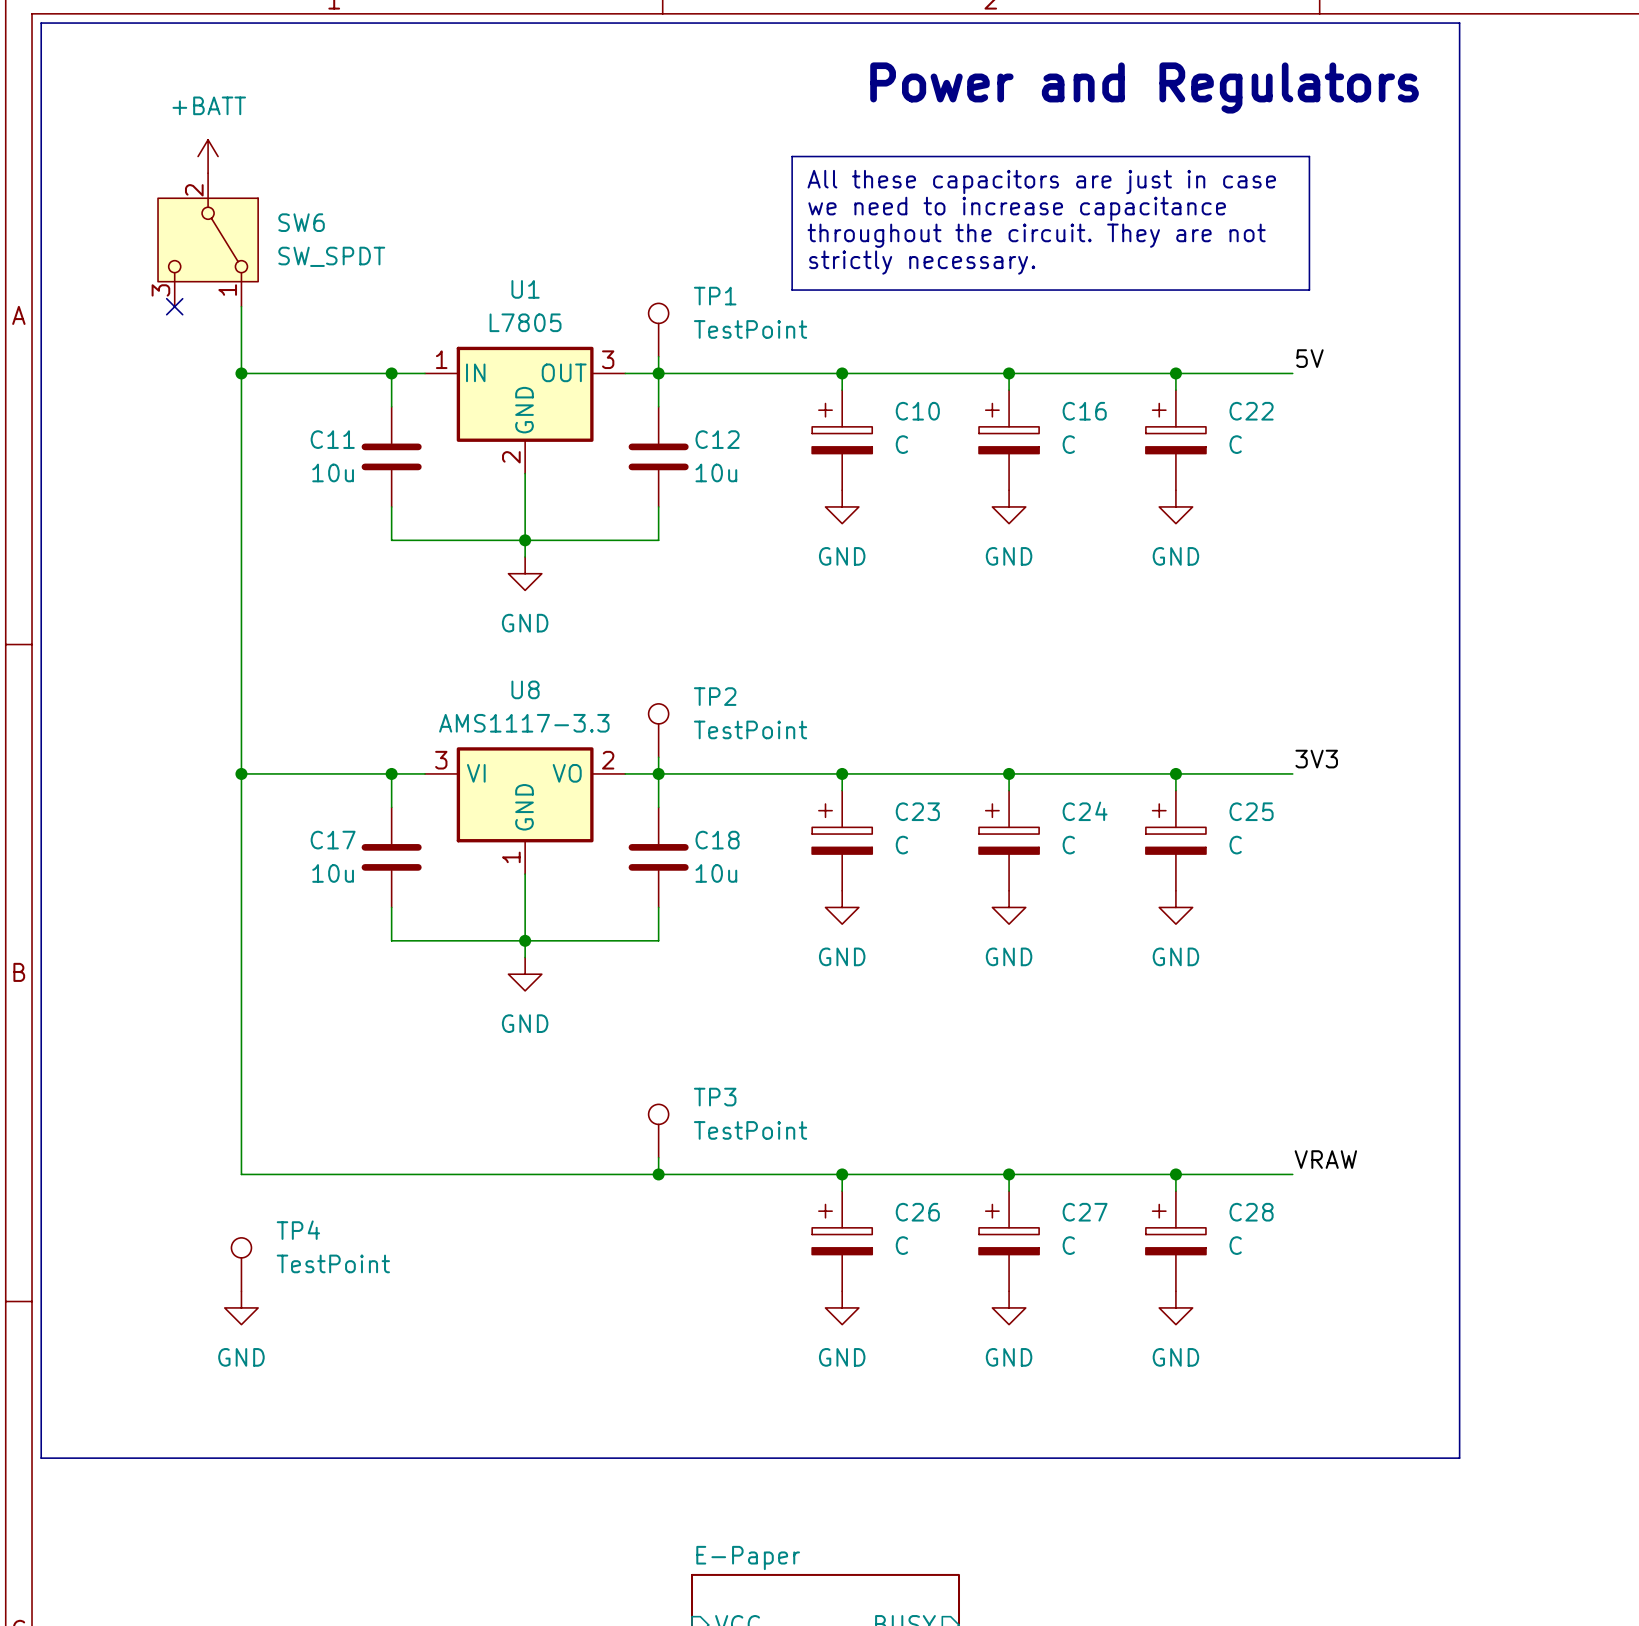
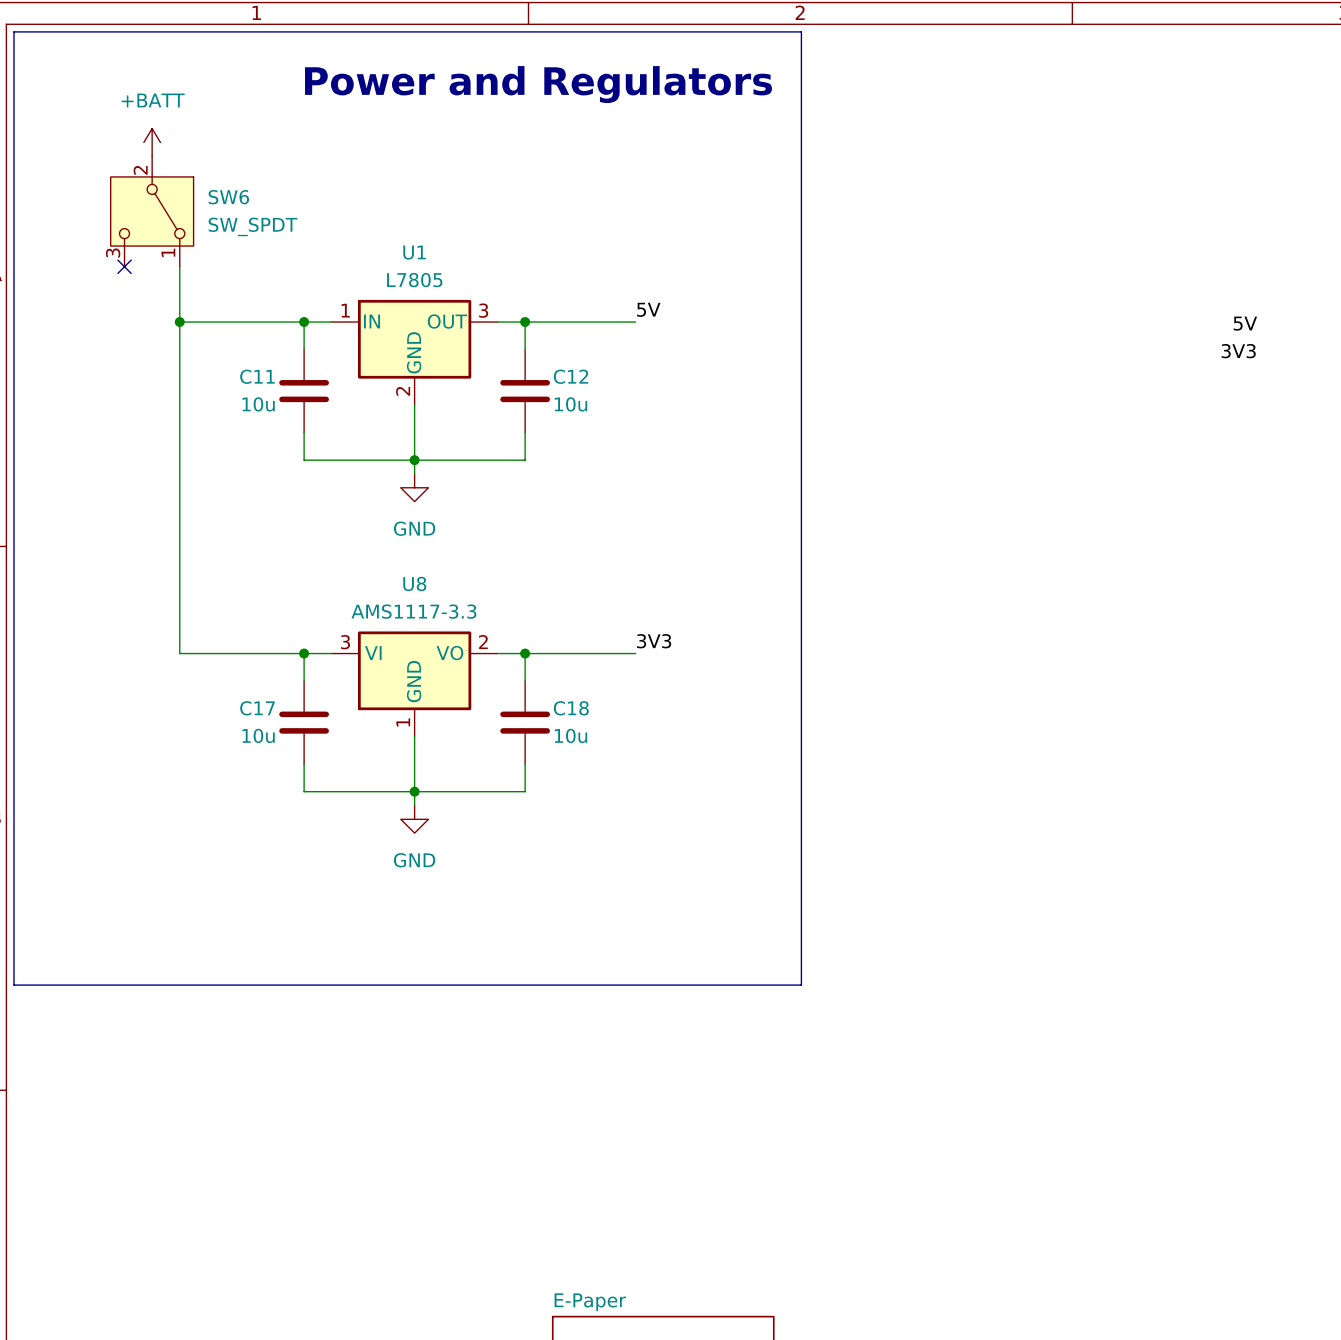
line: (992, 23) (1459, 23) (1459, 1458) (41, 1458) (41, 1174) -> (801, 31) (801, 985) (14, 985)
text: none -> Power and Regulators (538, 84)
text: Power and Regulators (1144, 87) -> none
line: (792, 156) (1309, 156) (1309, 290) (792, 290) (792, 156) -> none
text: All these capacitors are just in case (1041, 181) -> none
text: we need to increase capacitance (1017, 208) -> none
text: throughout the circuit. They are not (1036, 235) -> none
text: strictly necessary. (922, 262) -> none
TP1: TestPoint (658, 330) -> none
wire: (658, 356) (658, 373) -> none
label: none -> 5V (648, 309)
label: 5V (1309, 358) -> none
wire: (792, 373) (1292, 373) -> none
wire: (842, 373) (842, 390) -> none
junction: (842, 373) -> none
wire: (1009, 373) (1009, 390) -> none
junction: (1009, 373) -> none
wire: (1175, 373) (1175, 390) -> none
junction: (1175, 373) -> none
label: none -> 5V (1245, 323)
label: none -> 3V3 (1238, 351)
C10: C (842, 440) -> none
C16: C (1009, 440) -> none
C22: C (1175, 440) -> none
power symbol: GND (842, 506) -> none
power symbol: GND (1009, 506) -> none
power symbol: GND (1175, 506) -> none
TP2: TestPoint (658, 730) -> none
wire: (658, 757) (658, 773) -> none
label: none -> 3V3 (654, 641)
label: 3V3 (1316, 759) -> none
wire: (241, 773) (241, 1174) (1292, 1174) -> none
junction: (241, 773) -> none
wire: (792, 773) (1292, 773) -> none
wire: (842, 773) (842, 790) -> none
junction: (842, 773) -> none
wire: (1009, 773) (1009, 790) -> none
junction: (1009, 773) -> none
wire: (1175, 773) (1175, 790) -> none
junction: (1175, 773) -> none
C23: C (842, 840) -> none
C24: C (1009, 840) -> none
C25: C (1175, 840) -> none
power symbol: GND (842, 907) -> none
power symbol: GND (1009, 907) -> none
power symbol: GND (1175, 907) -> none
TP3: TestPoint (658, 1131) -> none
wire: (658, 1157) (658, 1174) -> none
label: VRAW (1325, 1159) -> none
junction: (658, 1174) -> none
wire: (842, 1174) (842, 1191) -> none
junction: (842, 1174) -> none
wire: (1009, 1174) (1009, 1191) -> none
junction: (1009, 1174) -> none
wire: (1175, 1174) (1175, 1191) -> none
junction: (1175, 1174) -> none
C26: C (842, 1241) -> none
C27: C (1009, 1241) -> none
C28: C (1175, 1241) -> none
TP4: TestPoint (241, 1264) -> none
power symbol: GND (241, 1307) -> none
power symbol: GND (842, 1307) -> none
power symbol: GND (1009, 1307) -> none
power symbol: GND (1175, 1307) -> none

